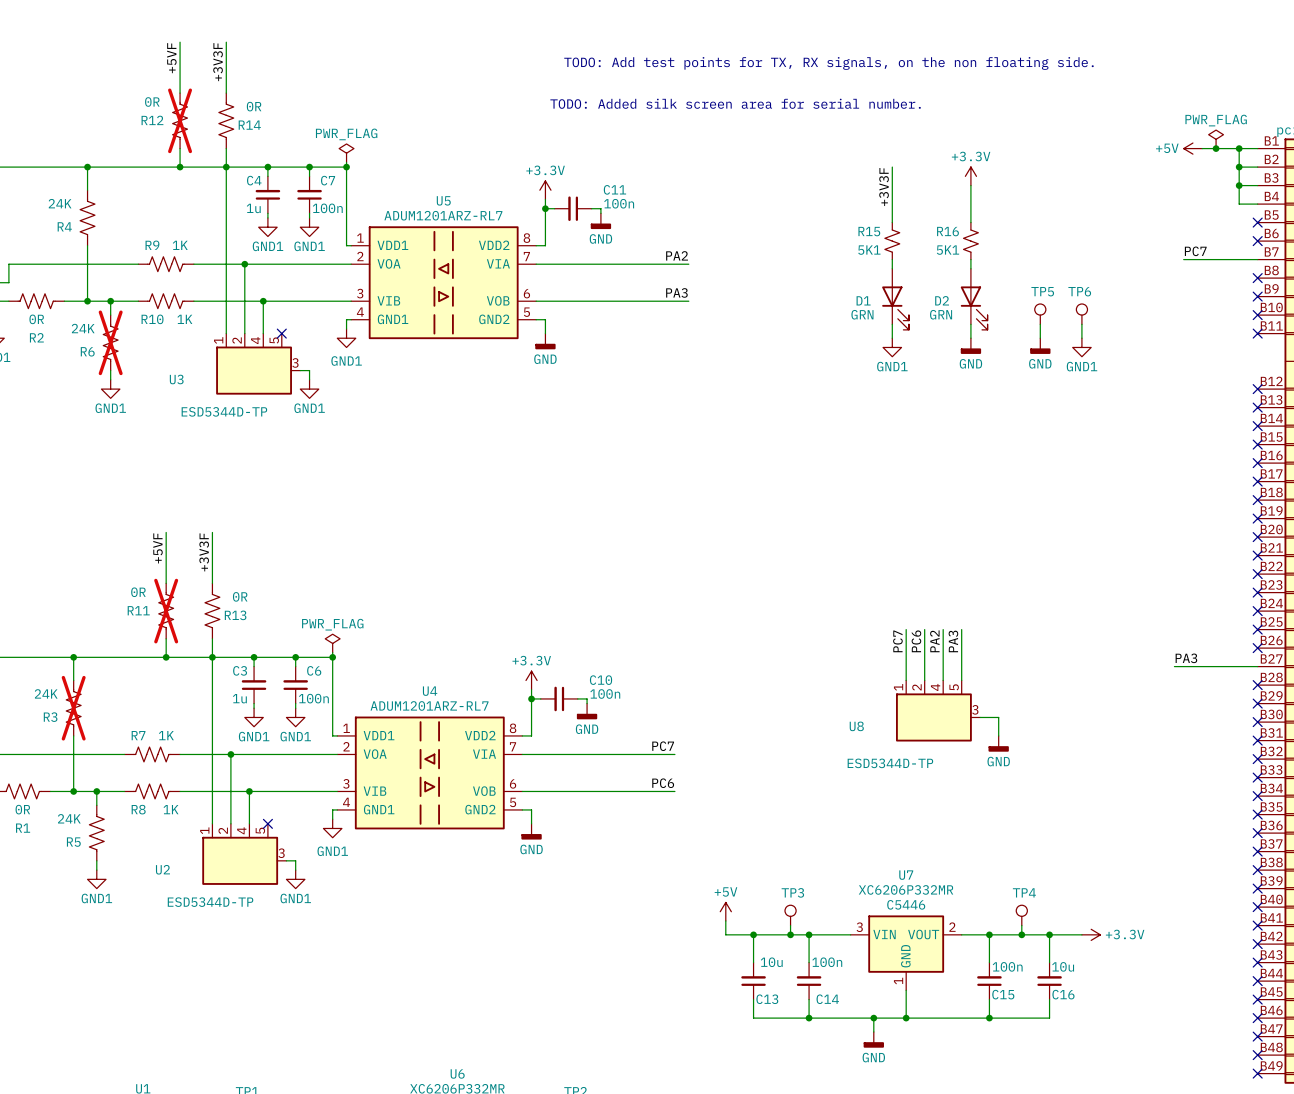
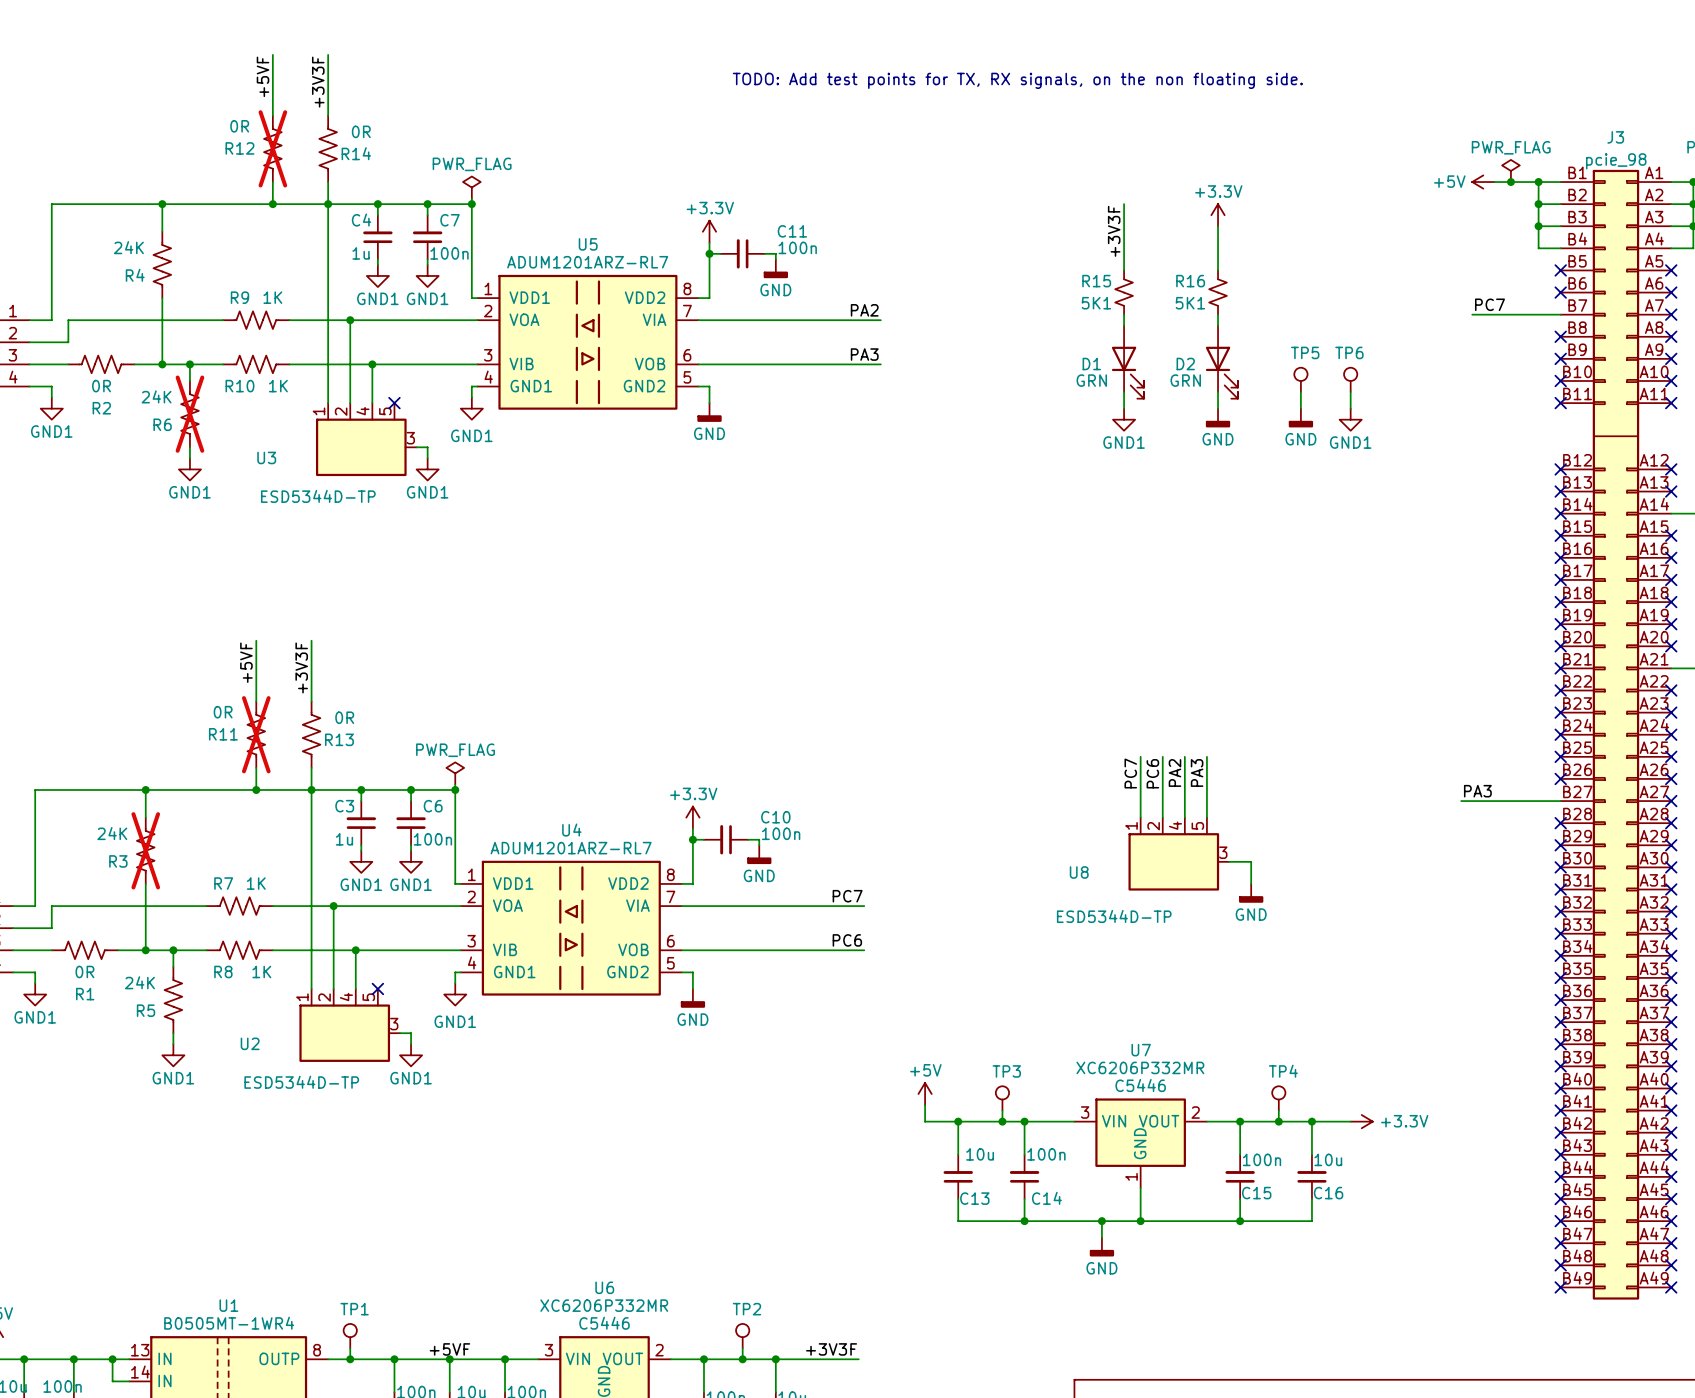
text: TODO: Added silk screen area for serial number. (735, 103) -> none

